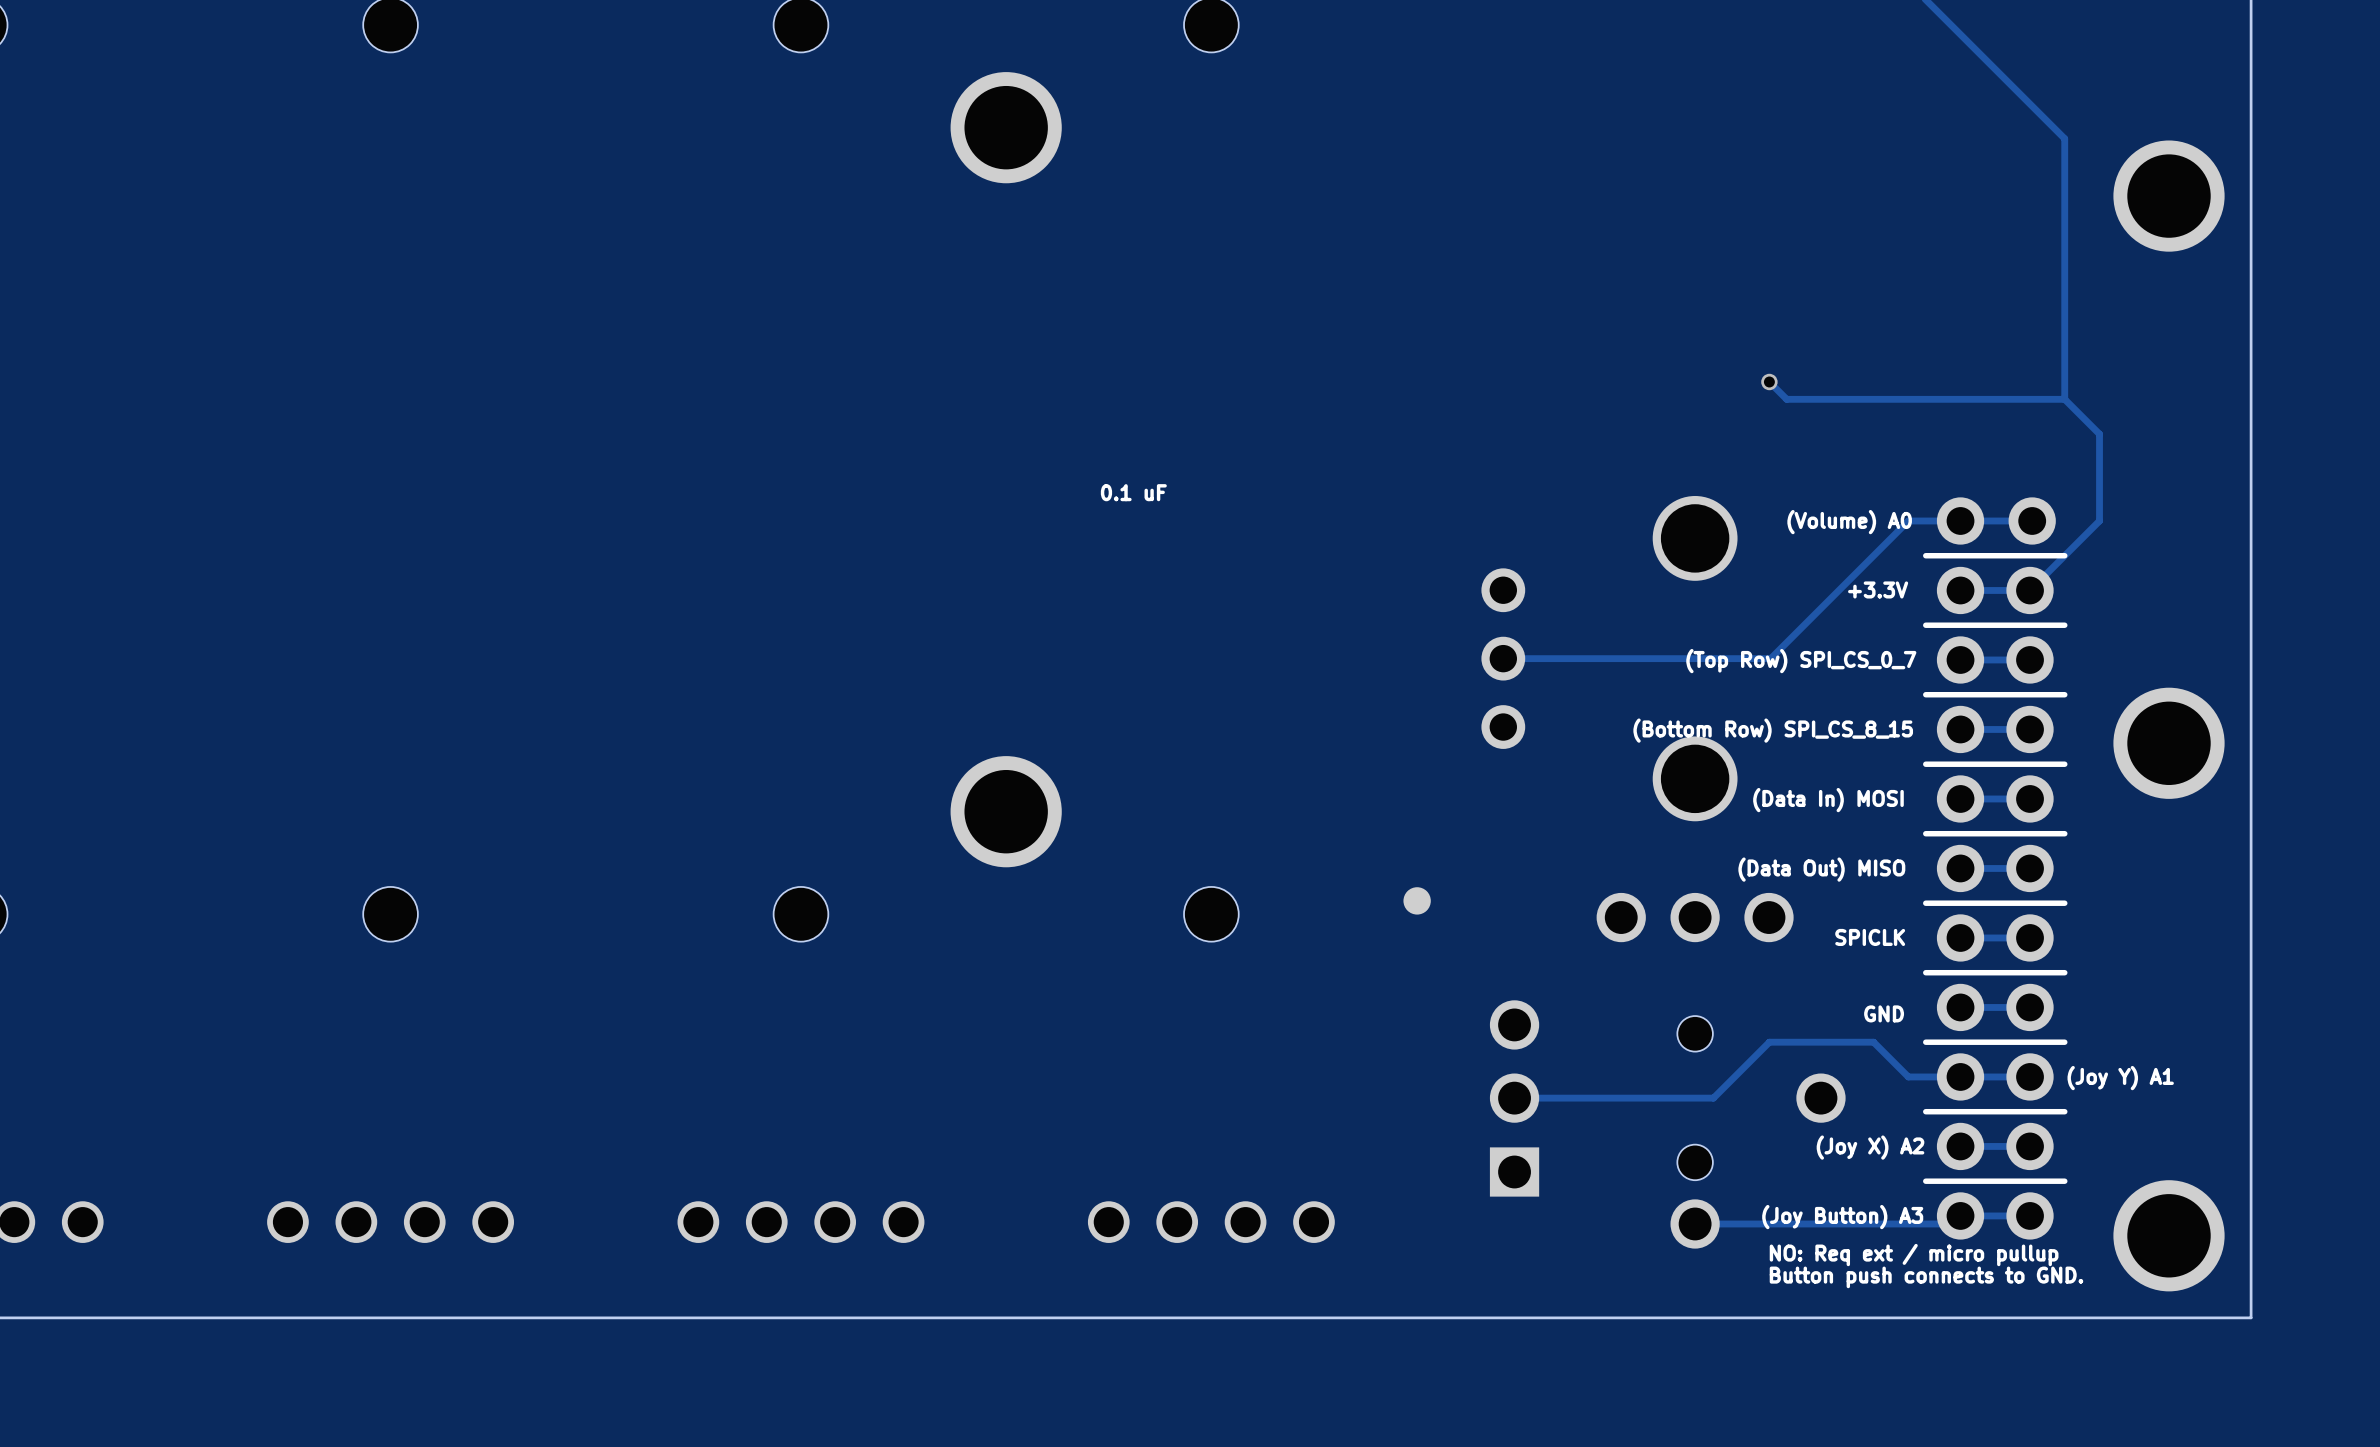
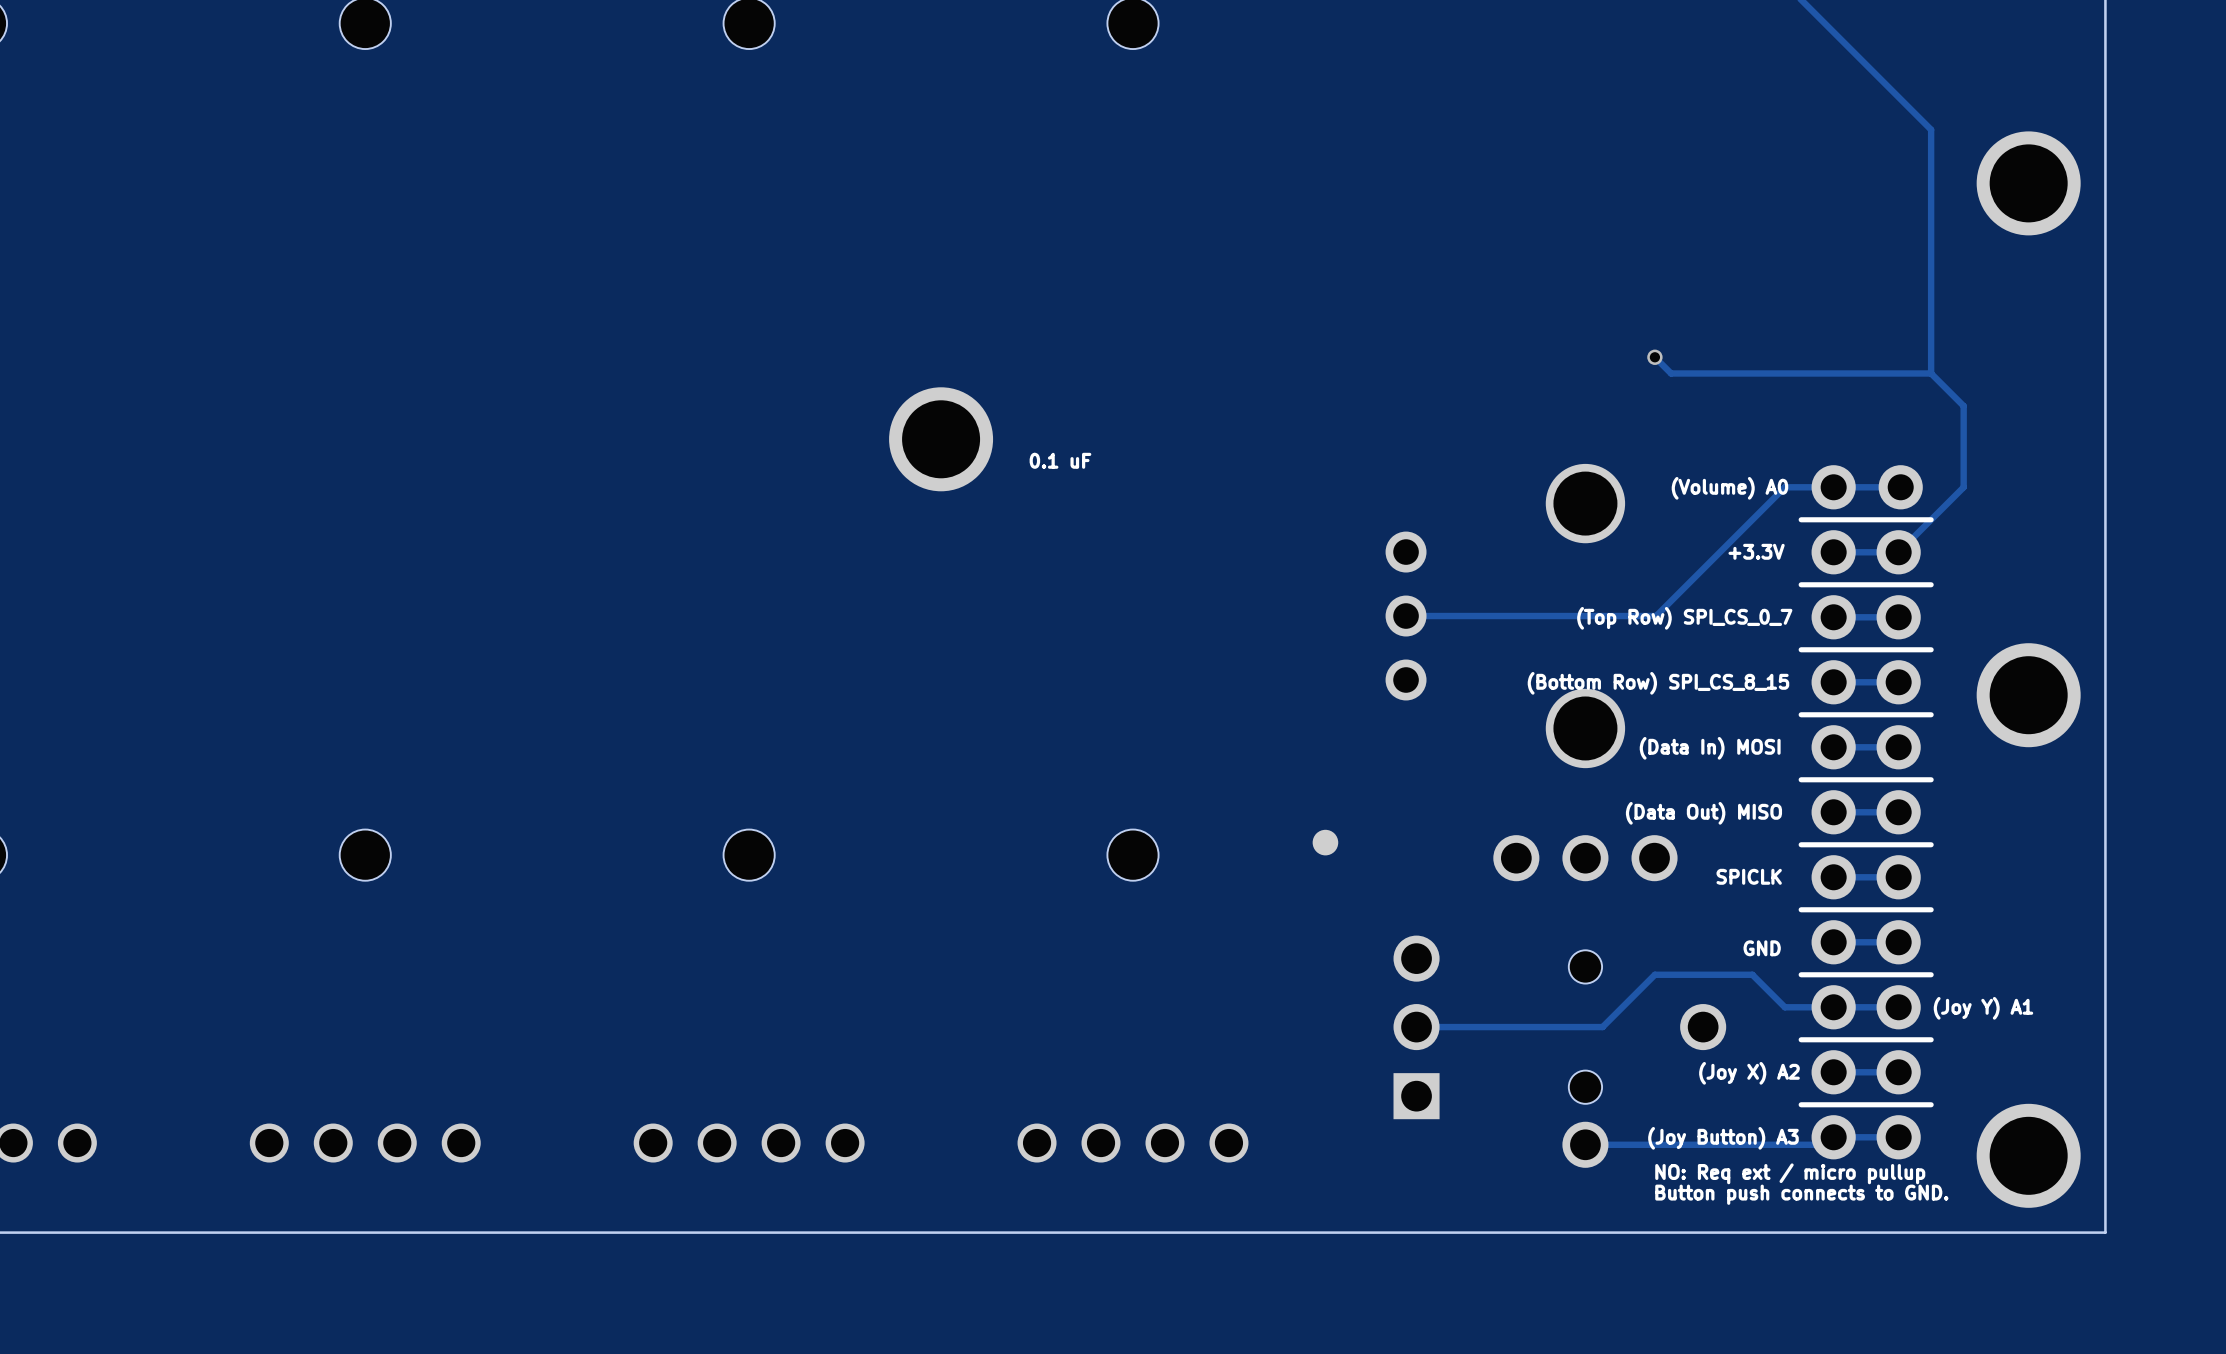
part: (1006, 127) -> none
part: none -> (941, 439)
part: (1006, 811) -> none

